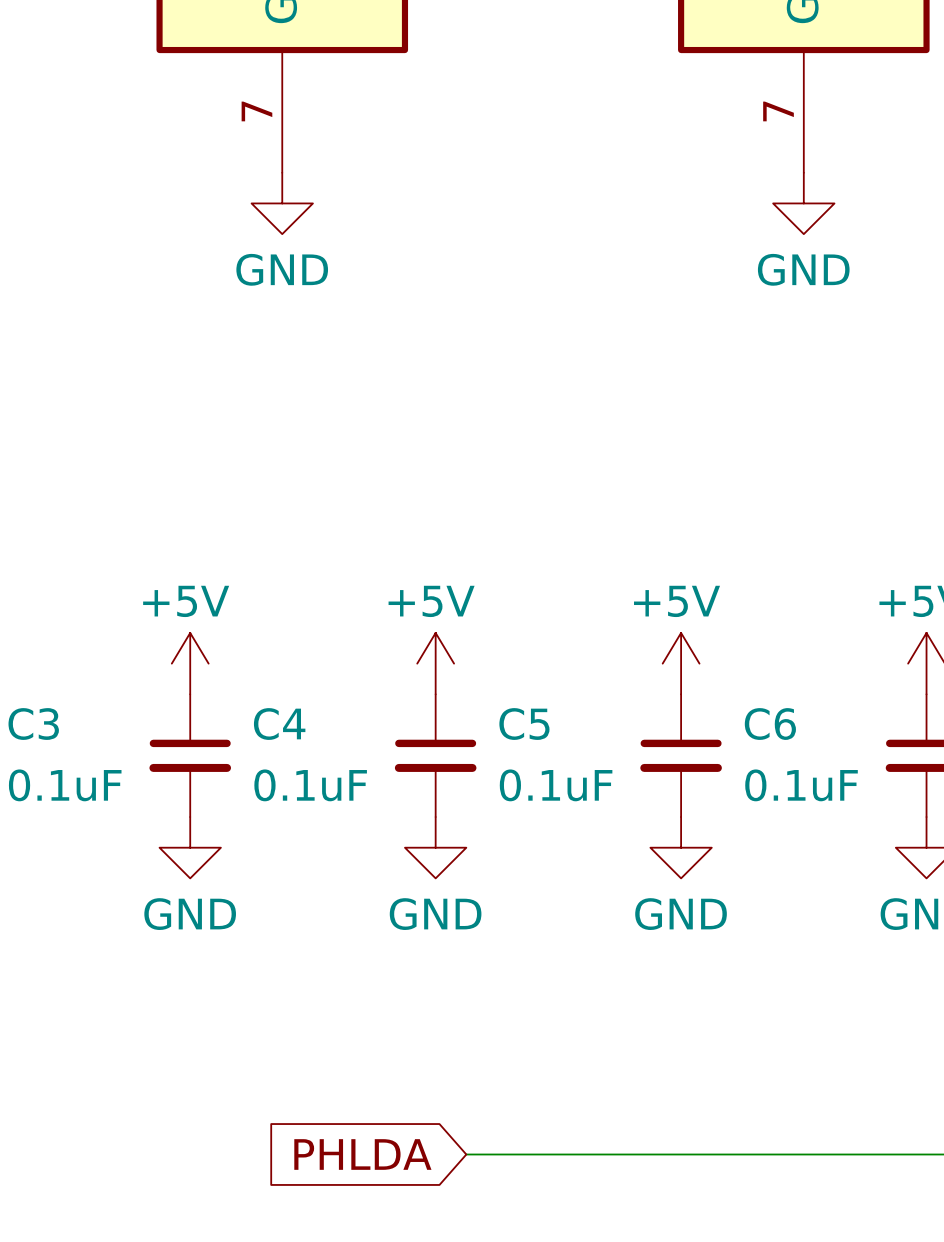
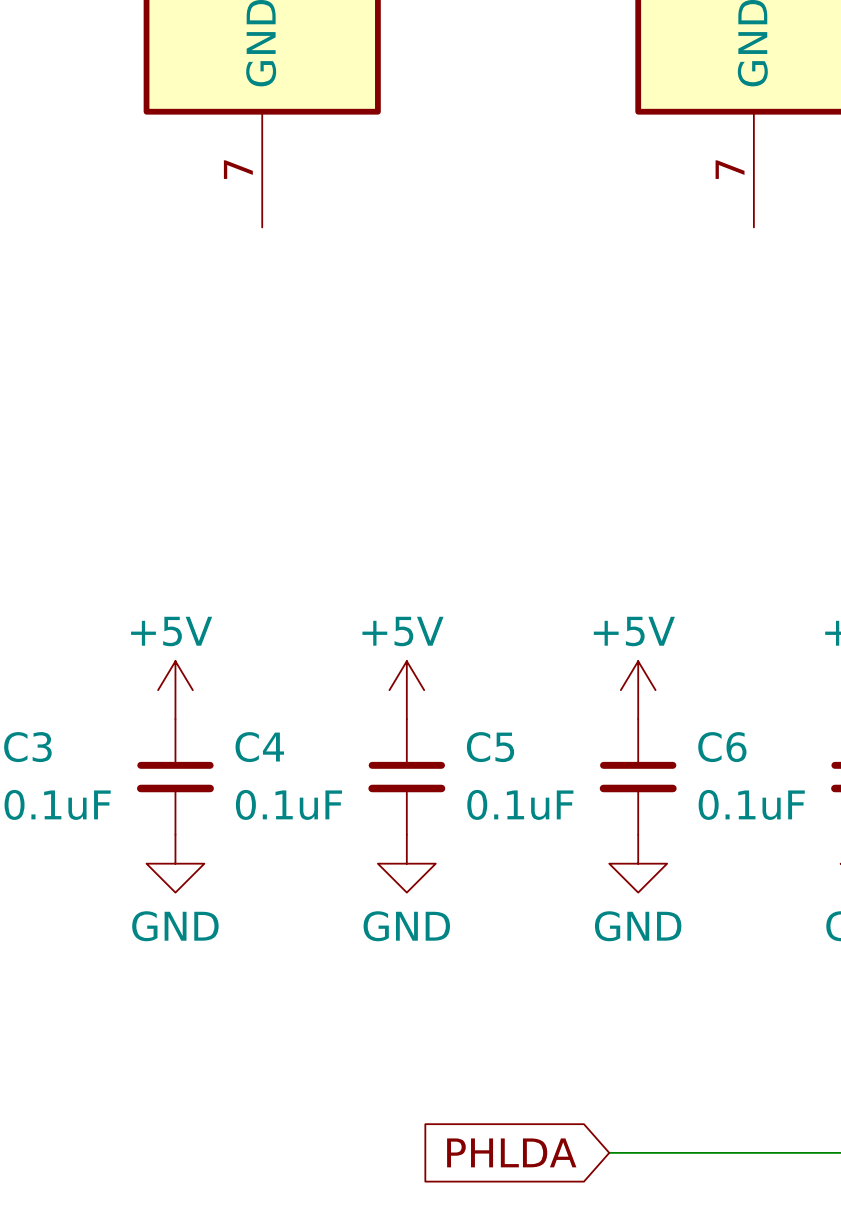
power symbol: GND (282, 203) -> none
power symbol: GND (803, 203) -> none
global label position: PHLDA (362, 1154) -> PHLDA (511, 1152)
wire: (466, 1154) (650, 1154) -> none

